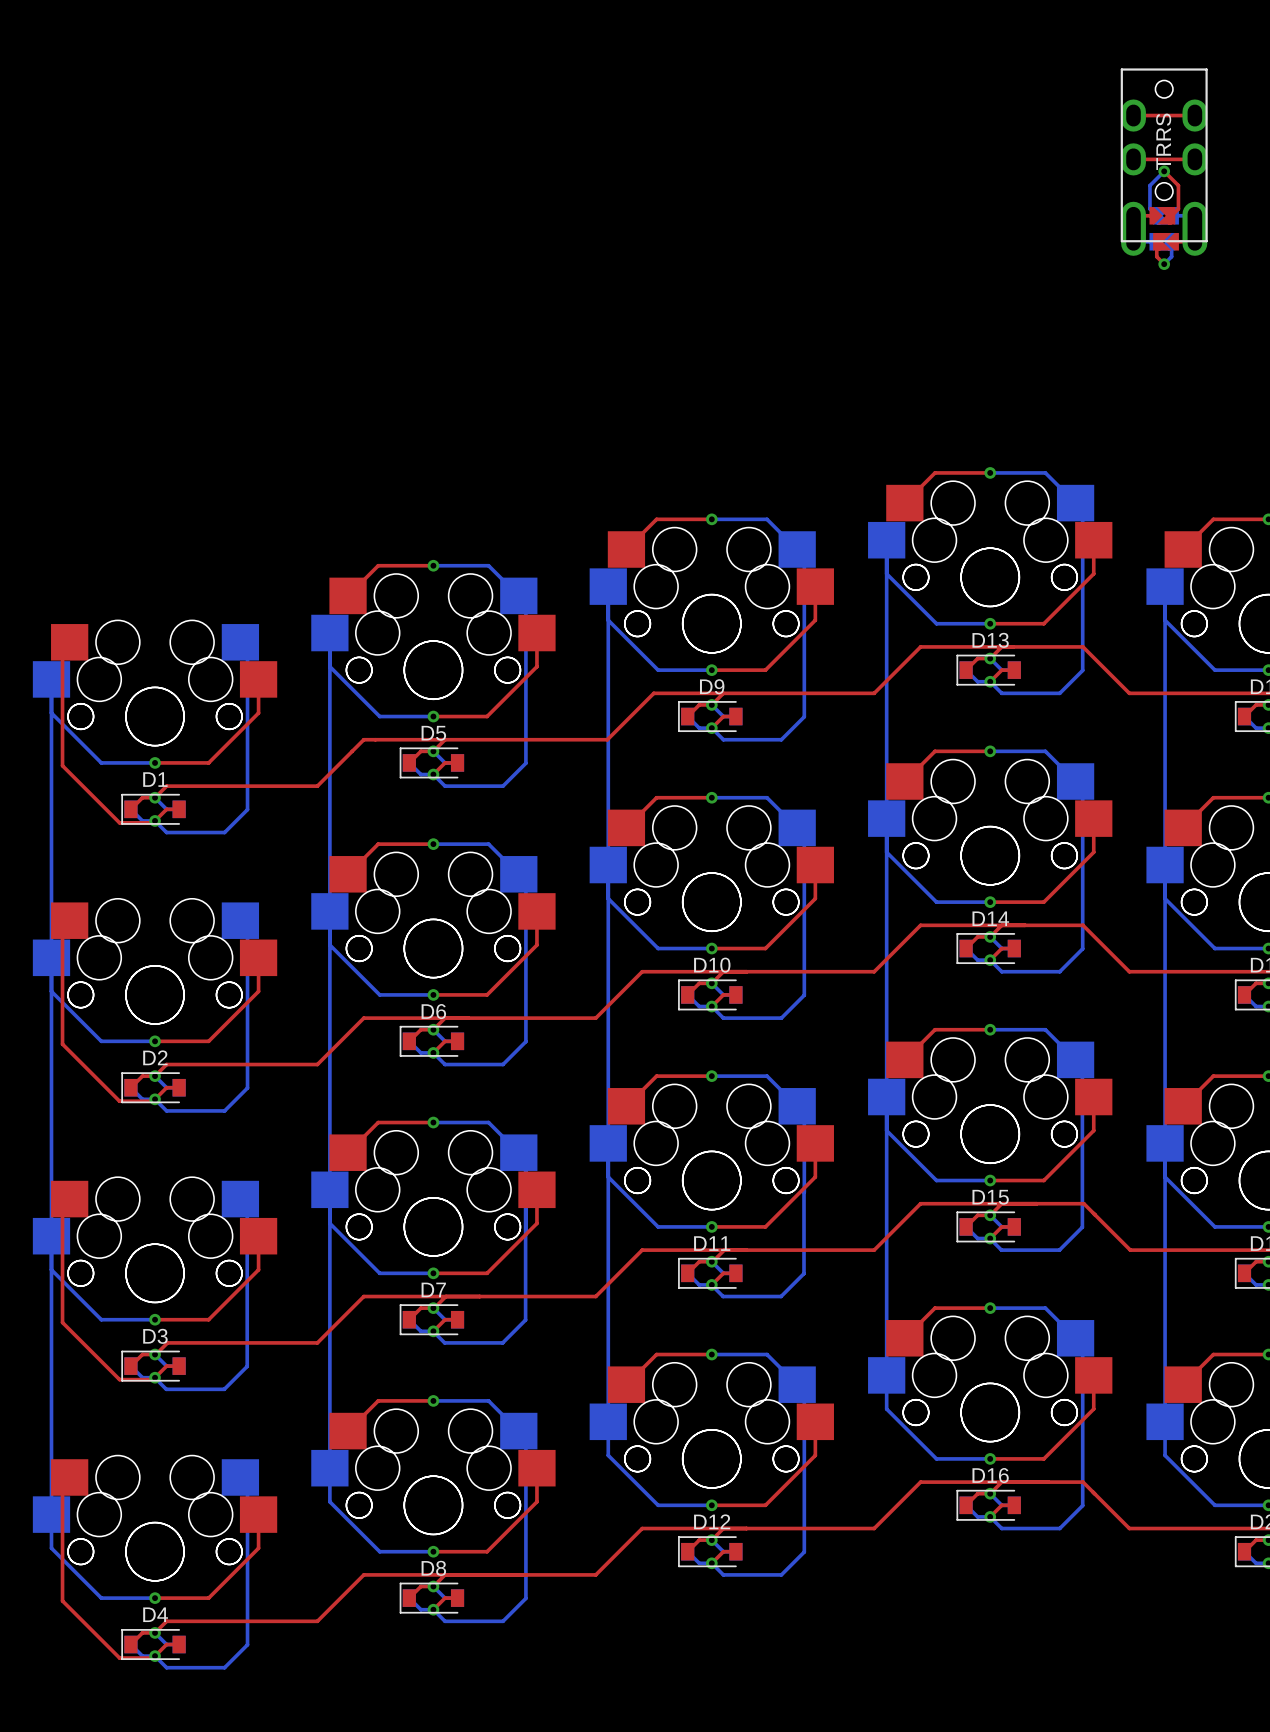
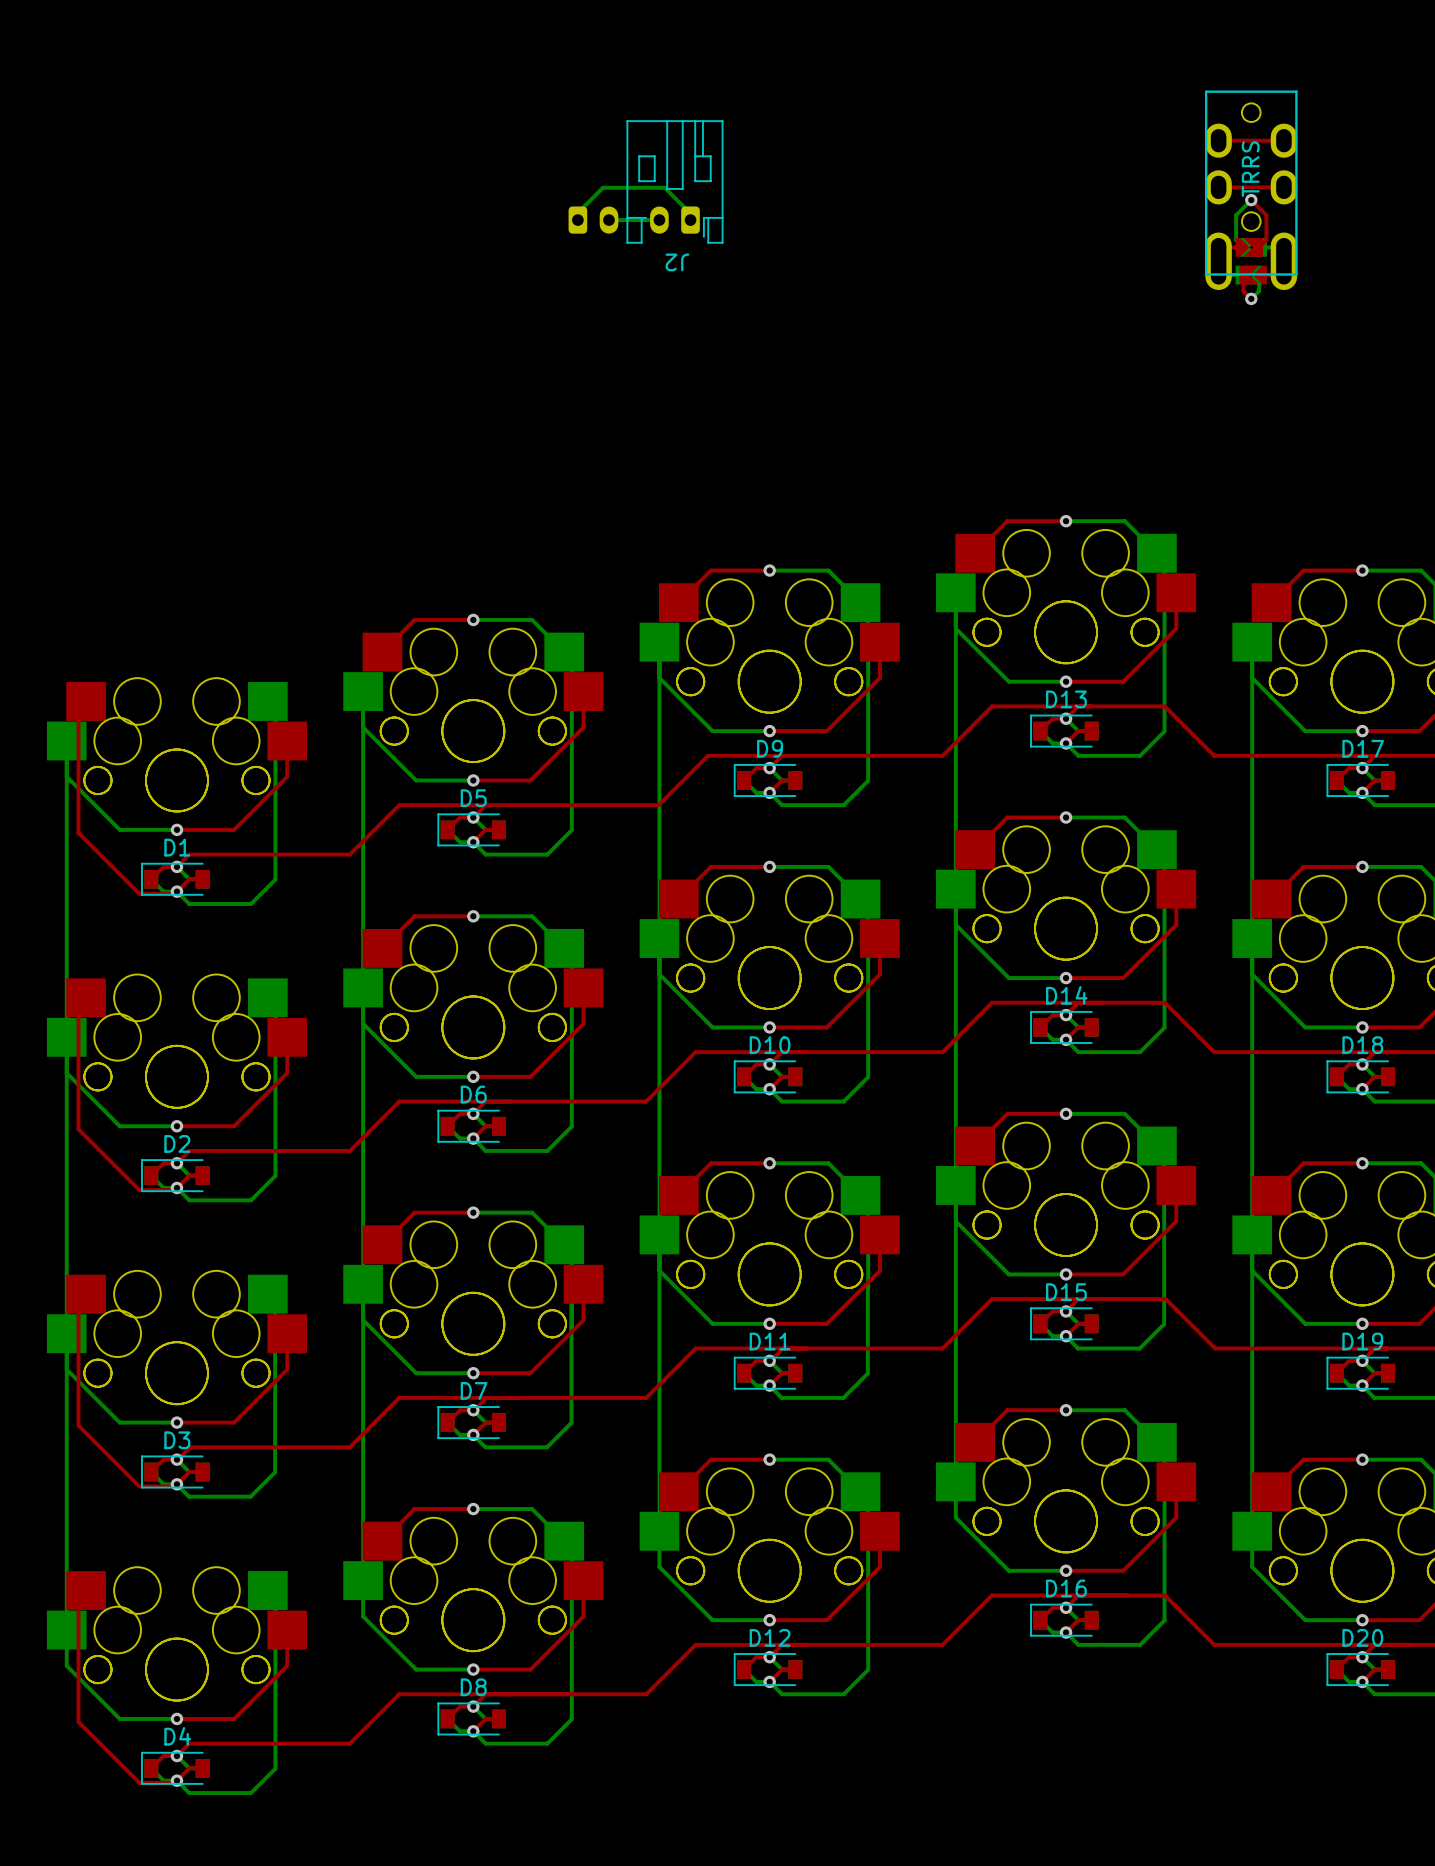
part: none -> (646, 181)
bottom track: none -> (577, 220) (577, 212) (602, 187) (664, 187) (690, 213) (690, 220)
bottom track: none -> (609, 220) (659, 220)
text: none -> J2 (677, 262)

